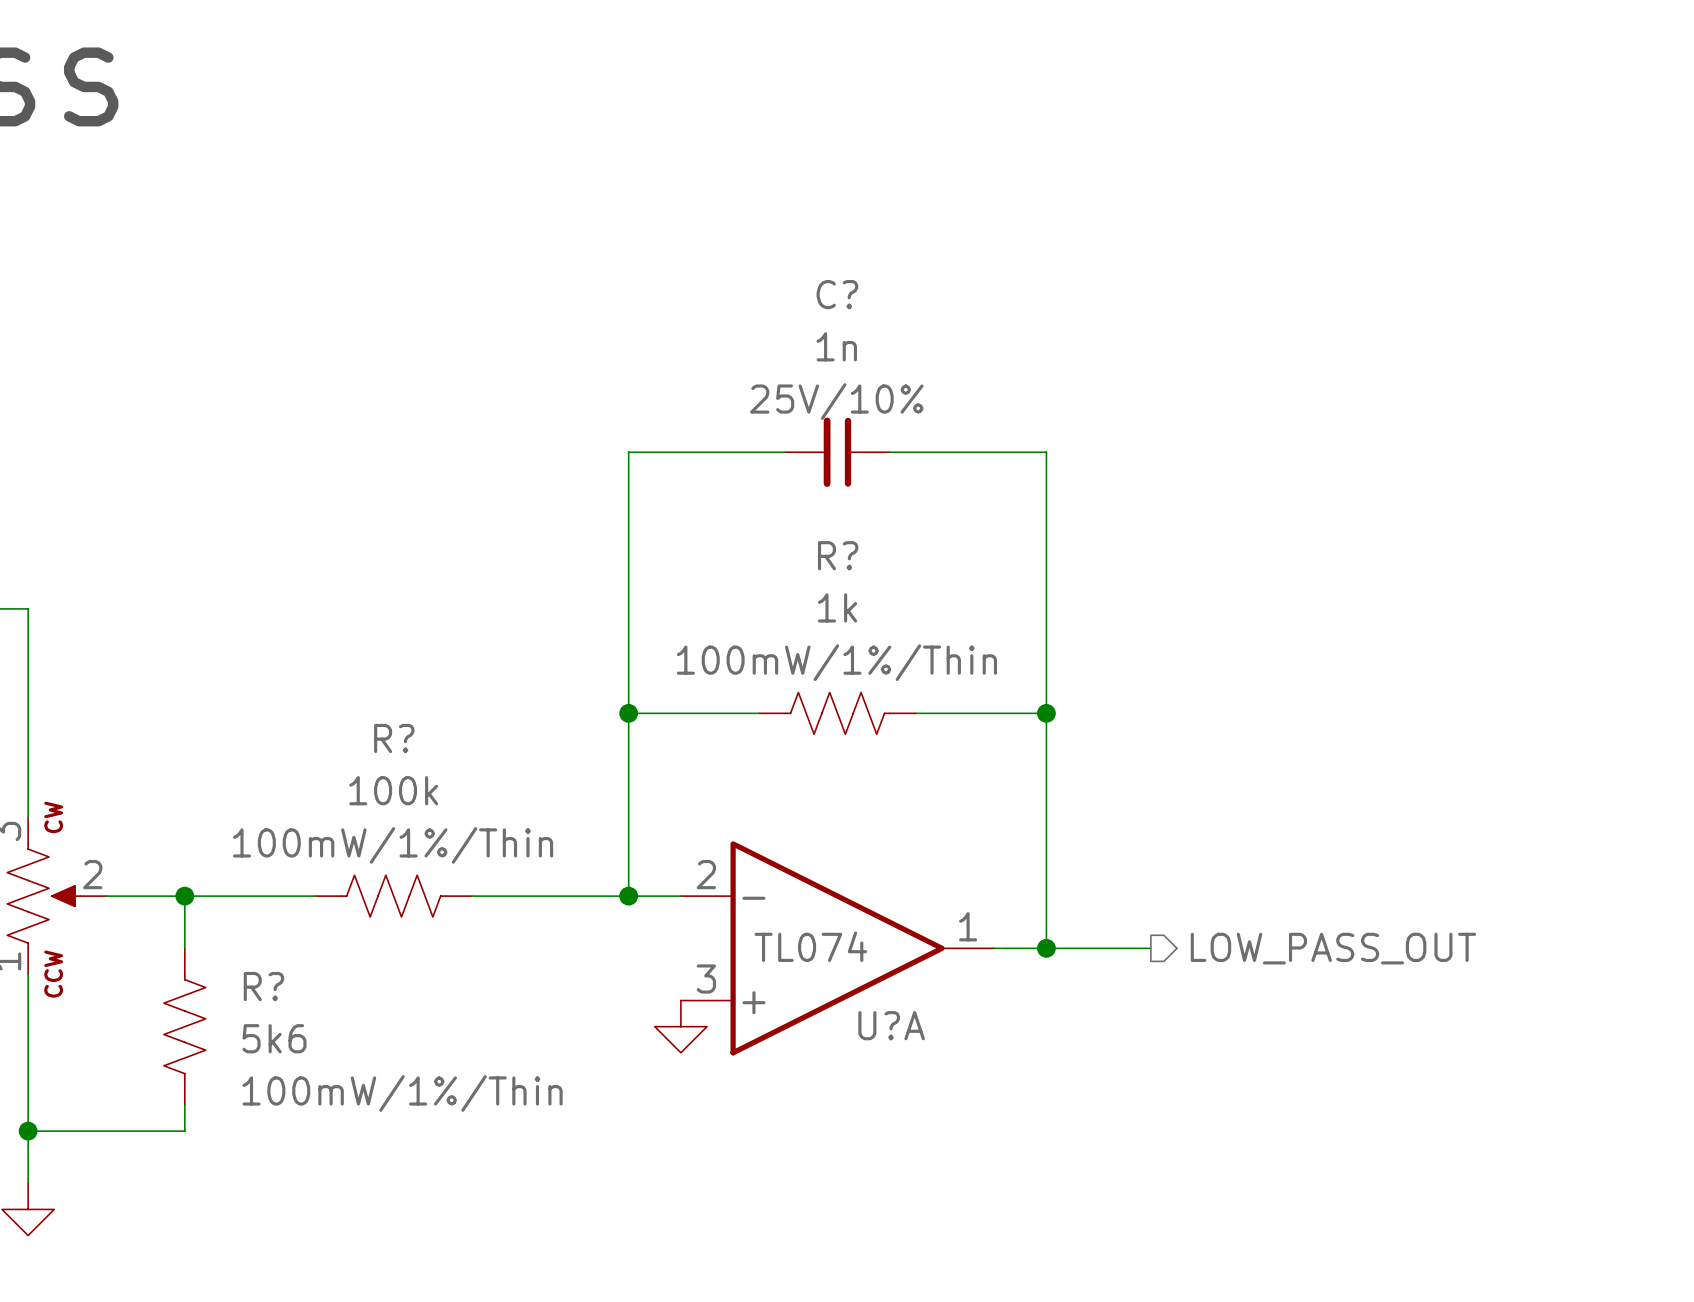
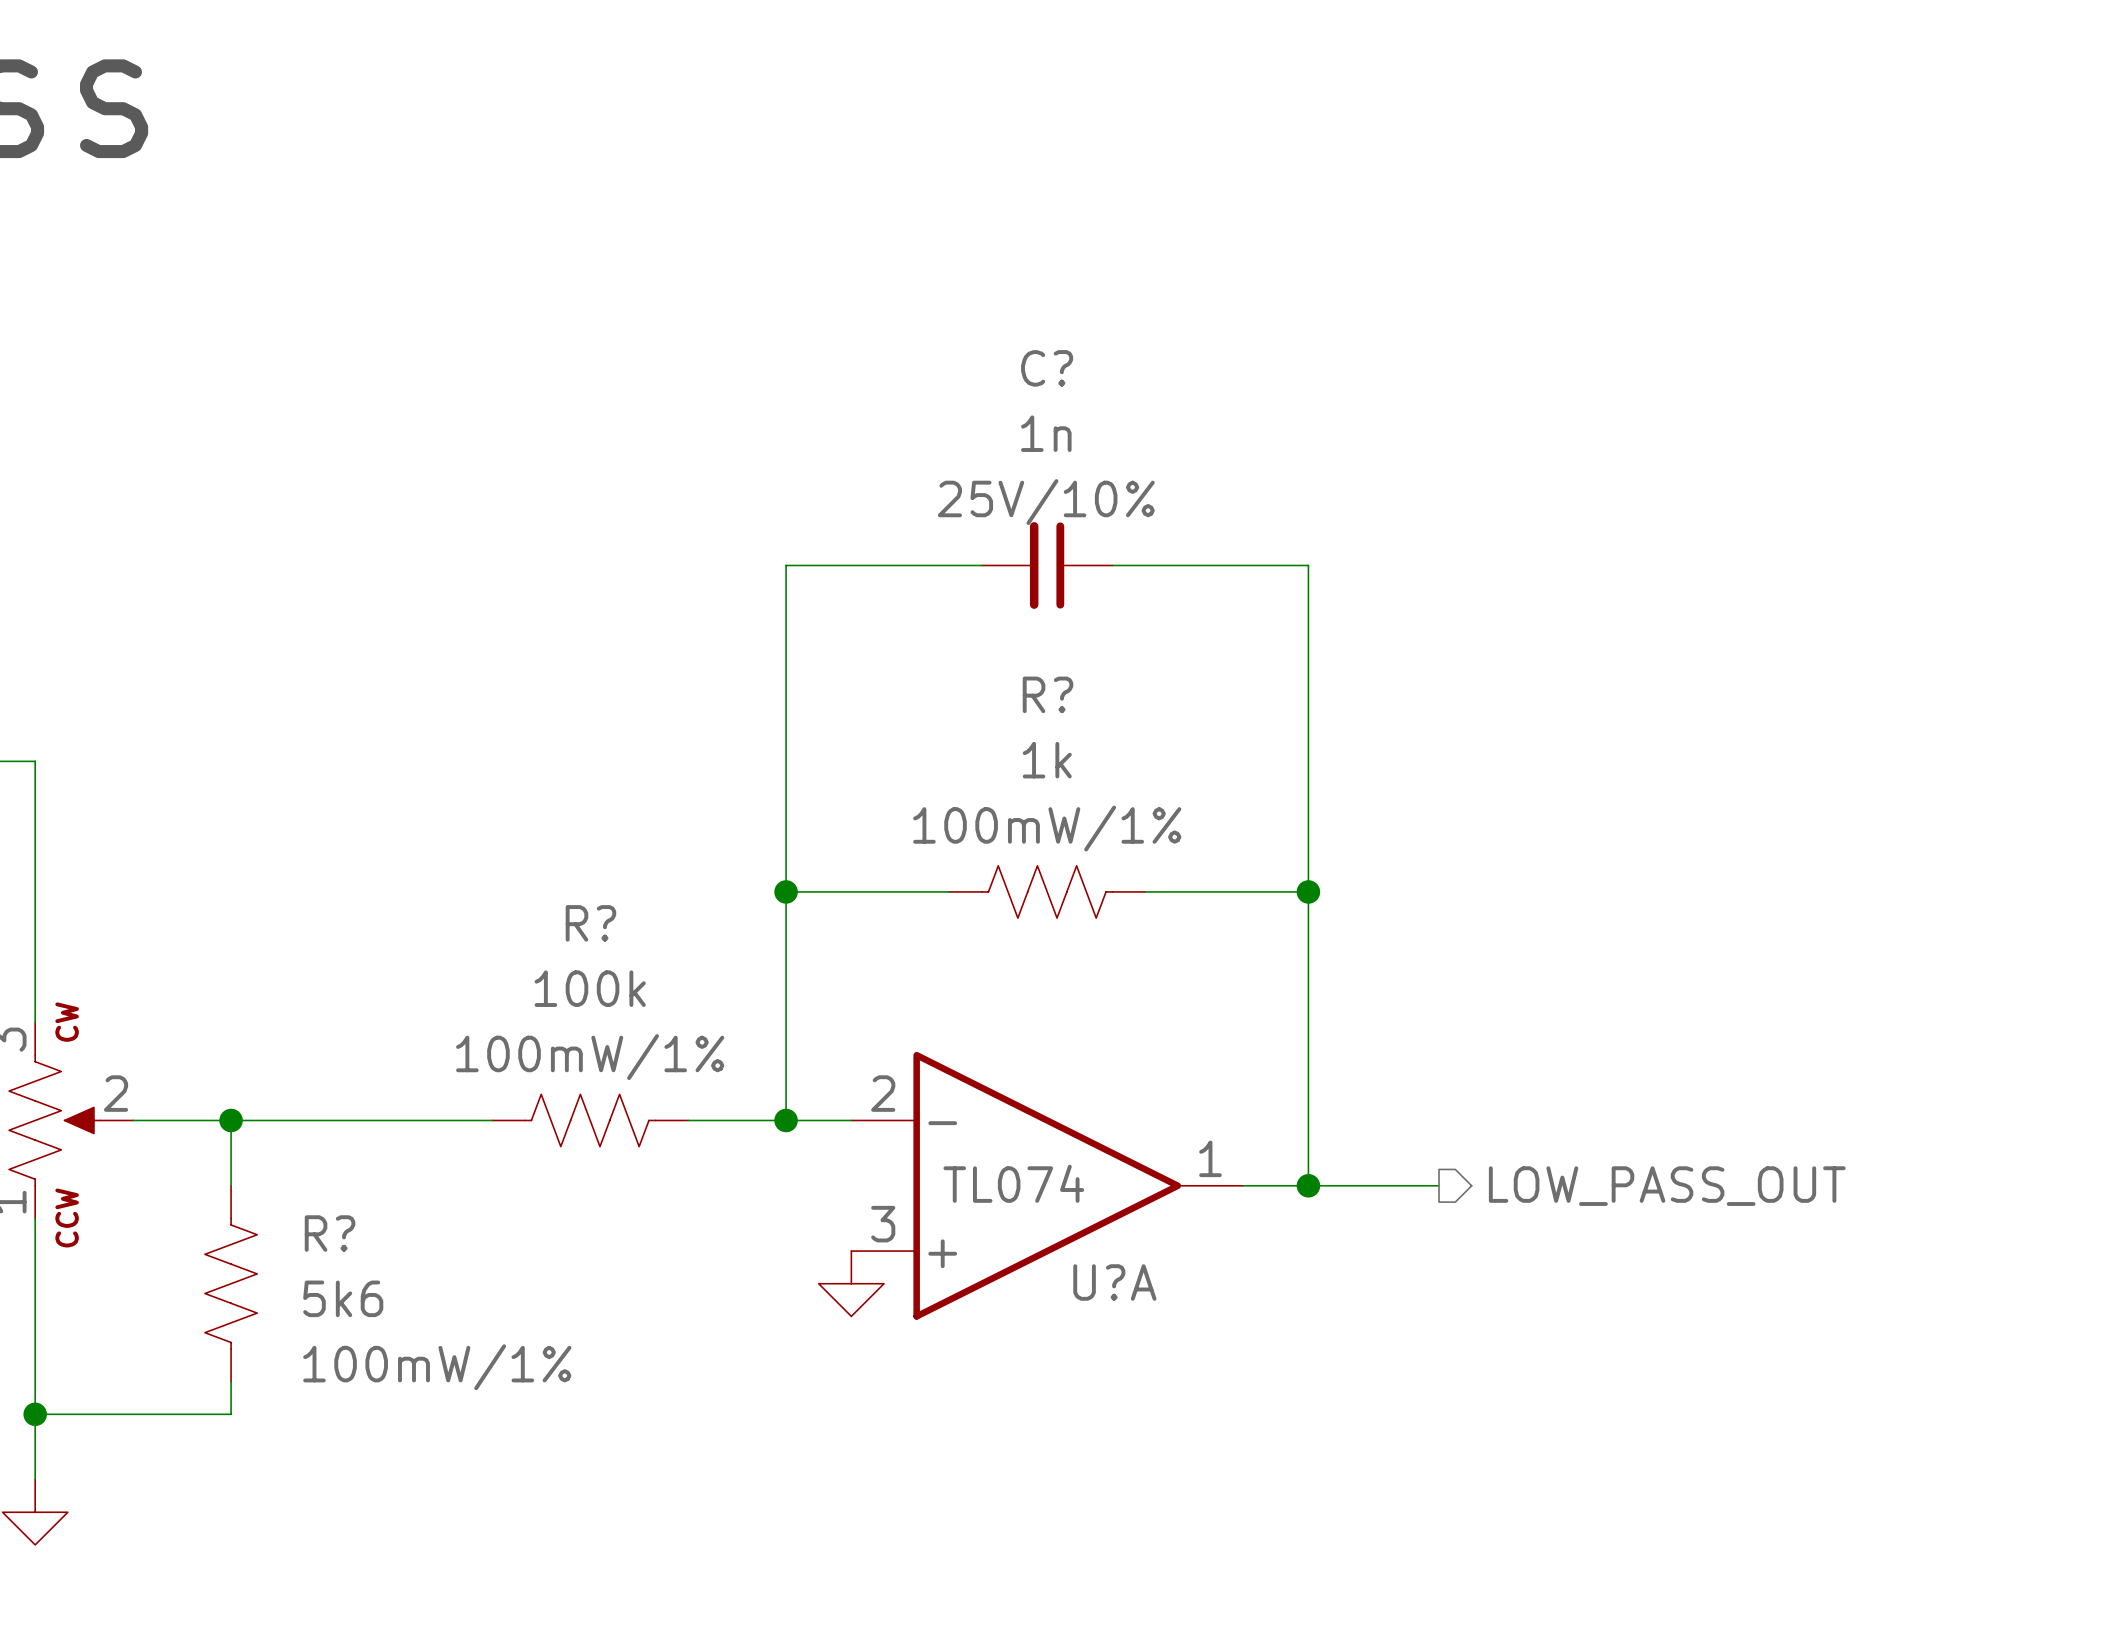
R? text: 100mW/1%/Thin (836, 662) -> 100mW/1% (1047, 828)
R?: 100k (393, 896) -> none
wire: (472, 896) (550, 896) -> (394, 1120) (492, 1120)
R?: none -> 100k (590, 1120)
R? text: 100mW/1%/Thin (402, 1093) -> 100mW/1% (437, 1367)

